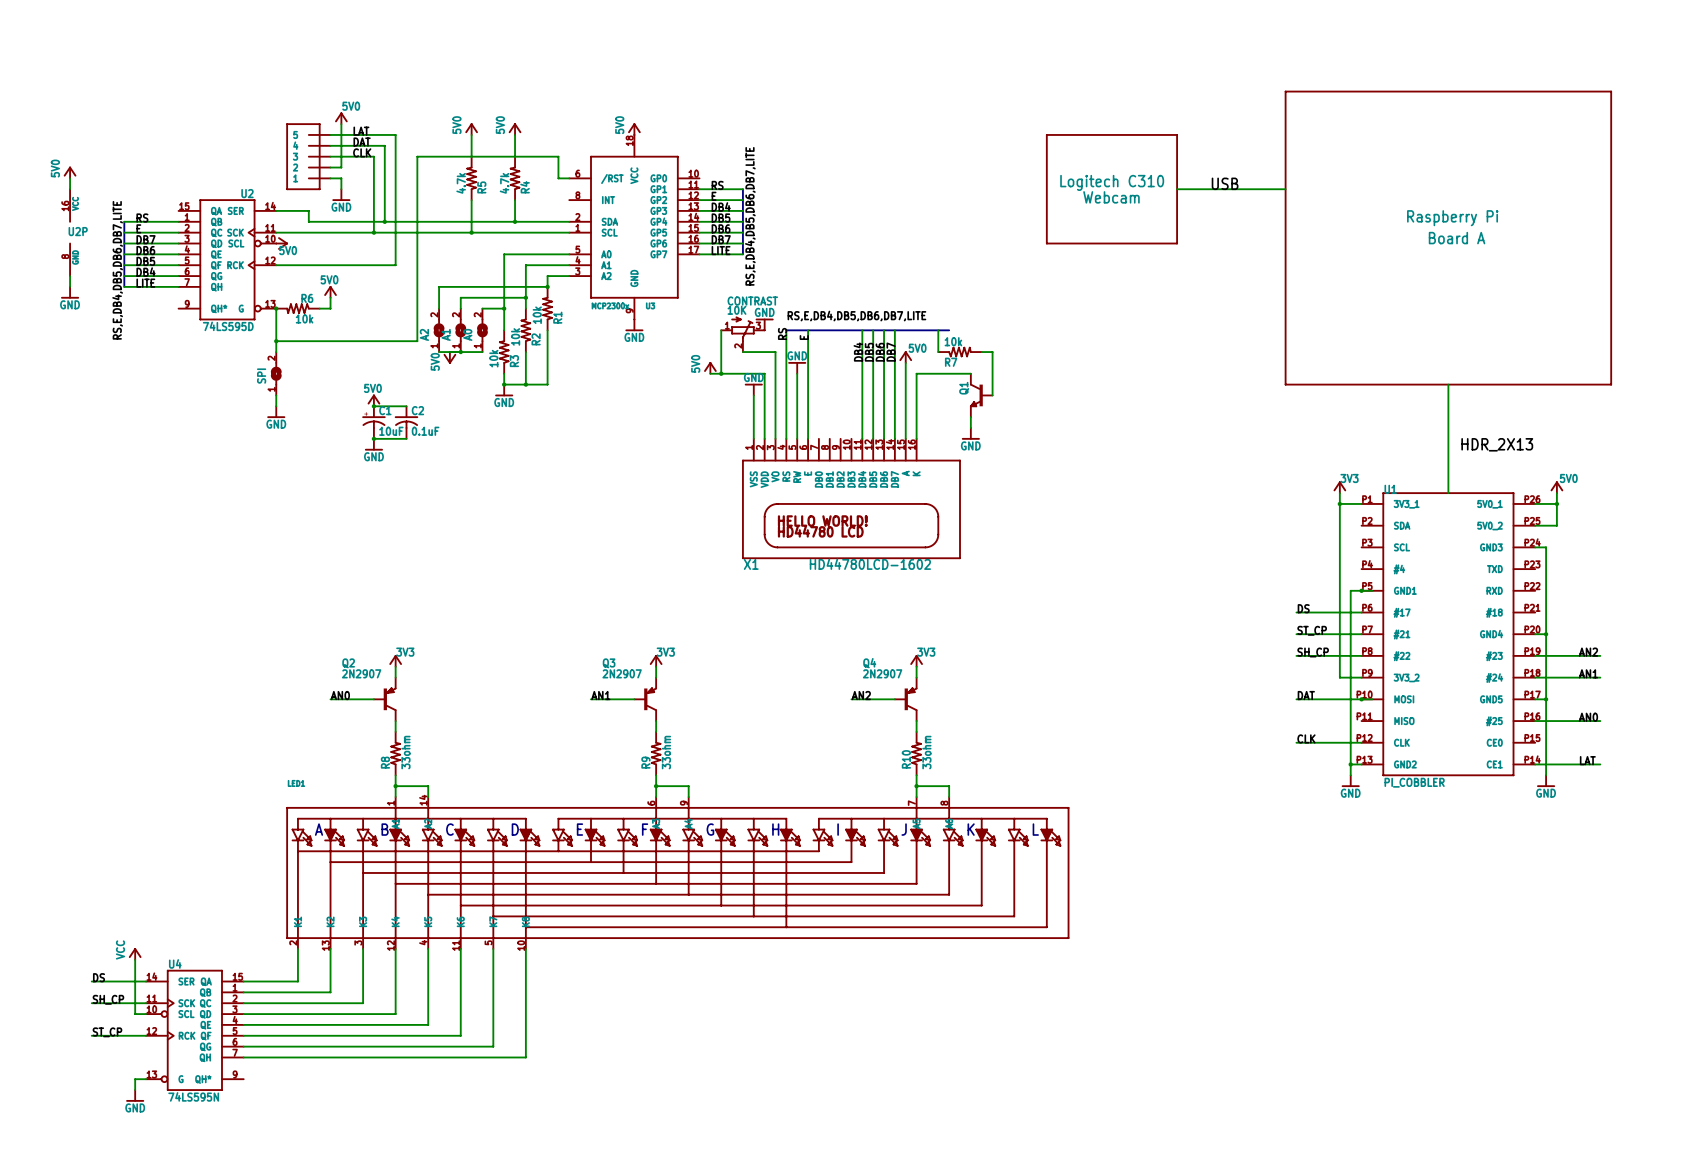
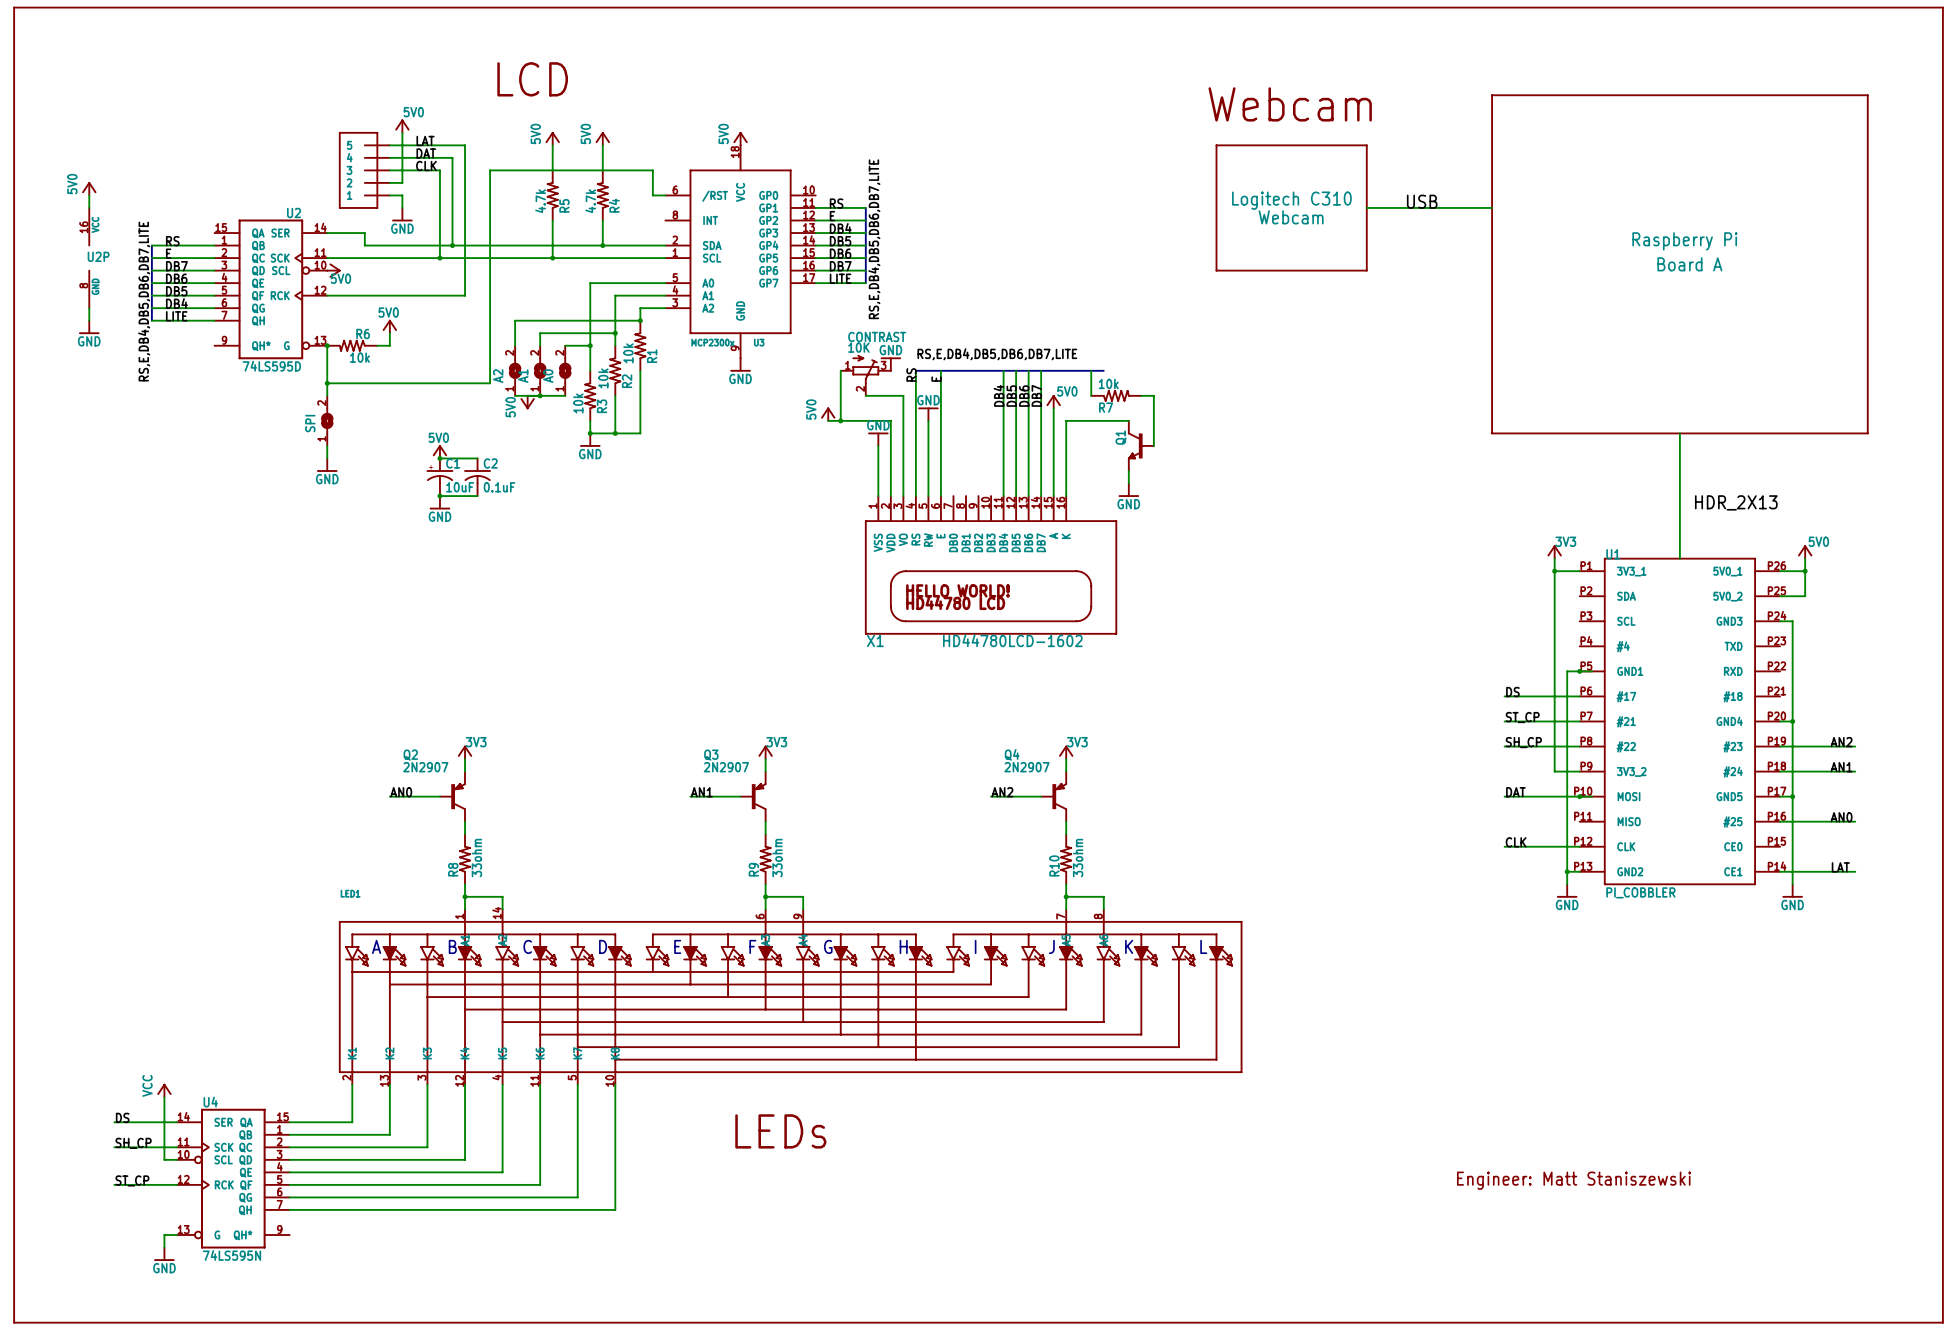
line: none -> (14, 7) (1942, 7) (1942, 1322) (14, 1322) (14, 7)
text: none -> LCD (532, 79)
text: none -> Webcam (1290, 104)
text: none -> LEDs (780, 1131)
text: none -> Engineer: Matt Staniszewski (1574, 1180)

